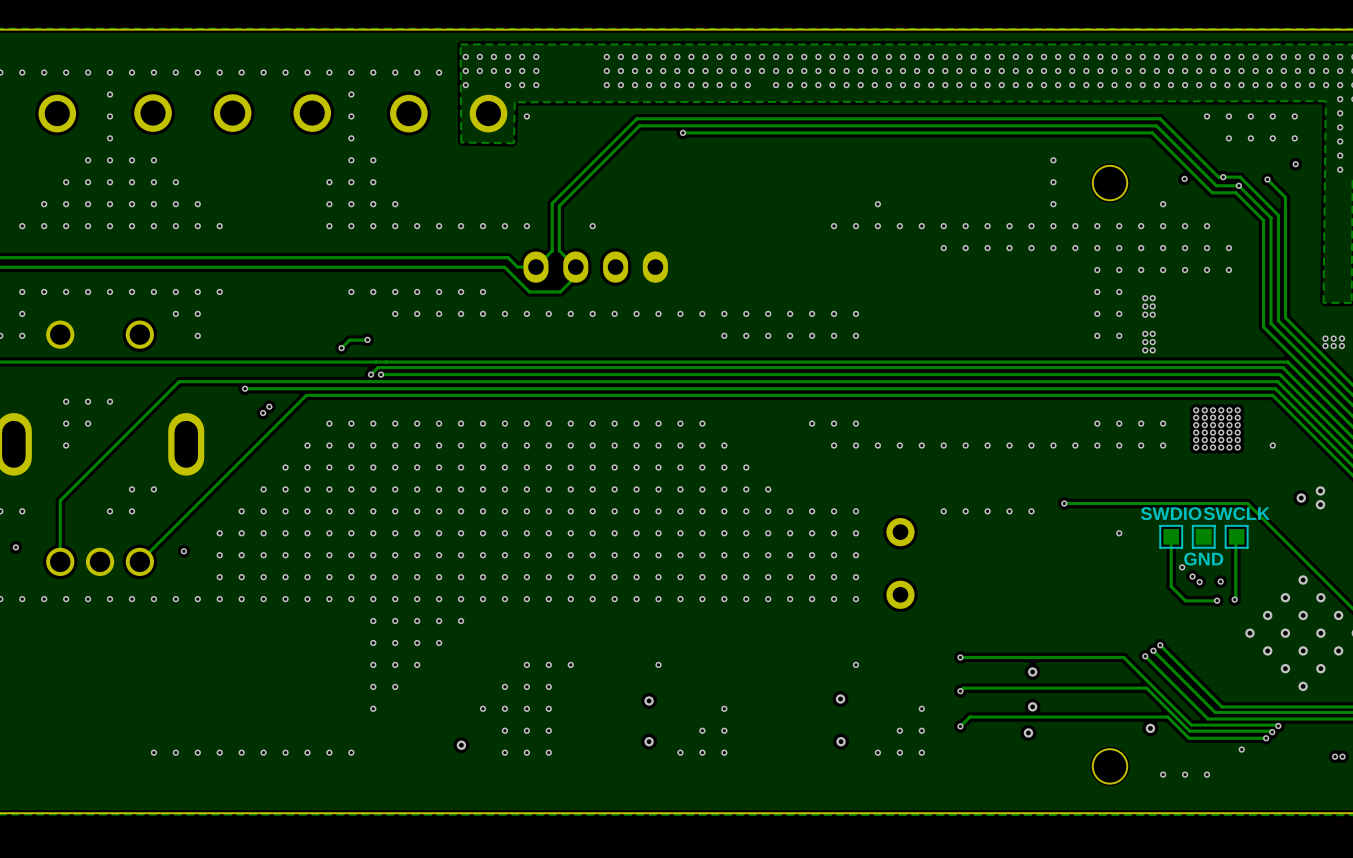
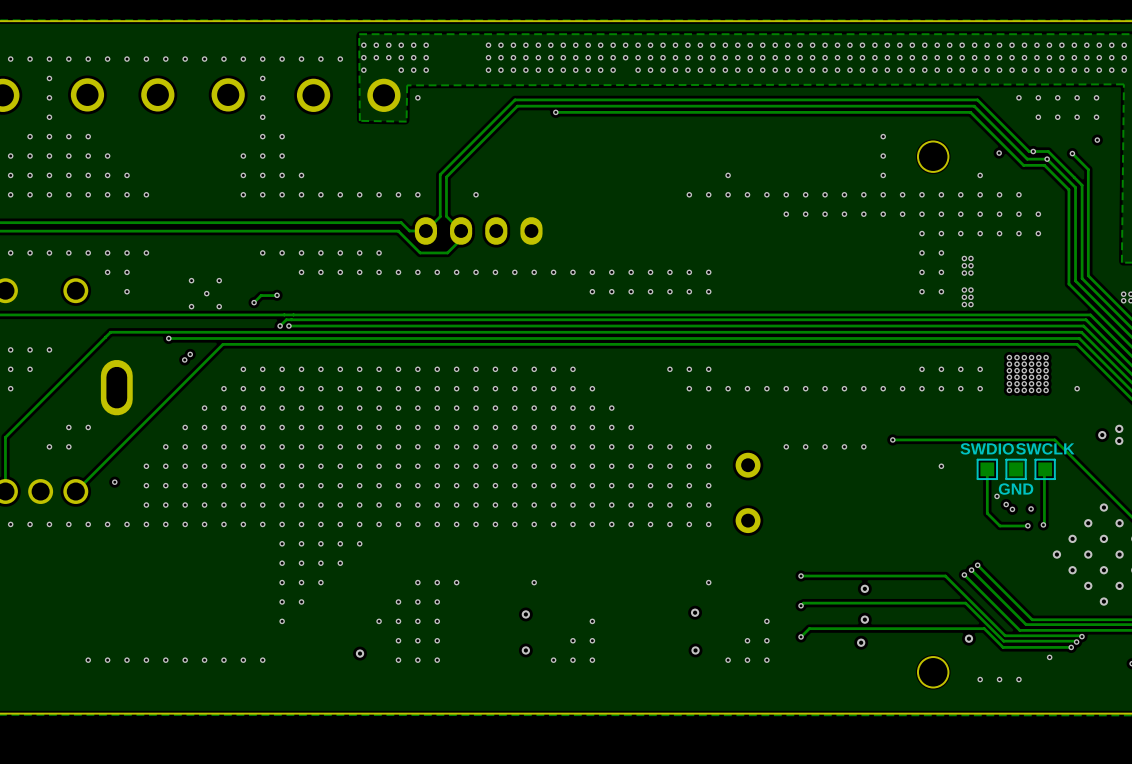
via: none -> (191, 280)
via: none -> (219, 280)
via: none -> (206, 293)
via: none -> (191, 306)
via: none -> (219, 306)

